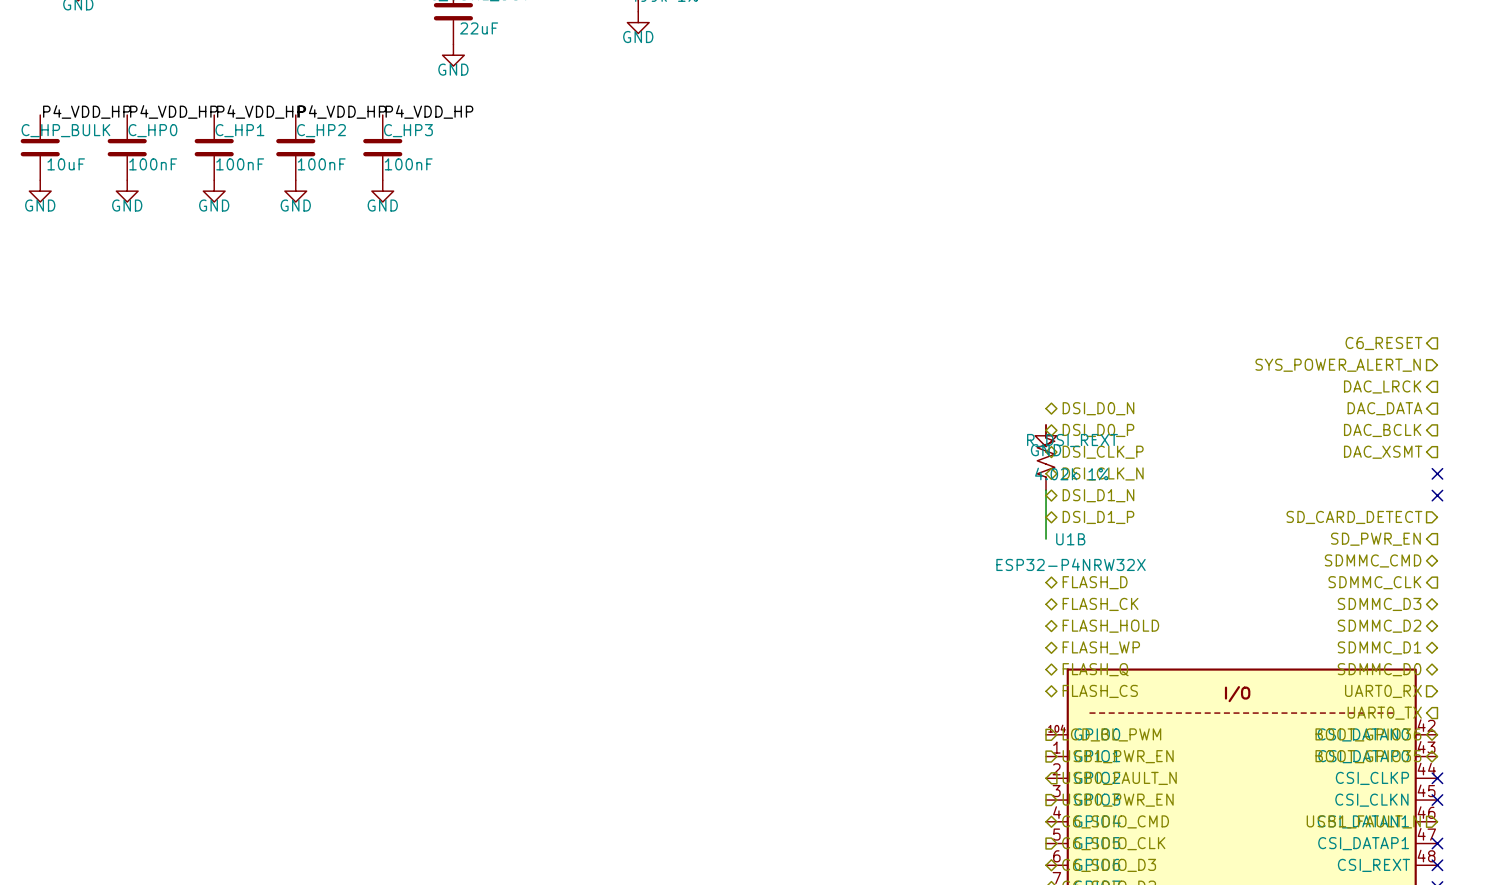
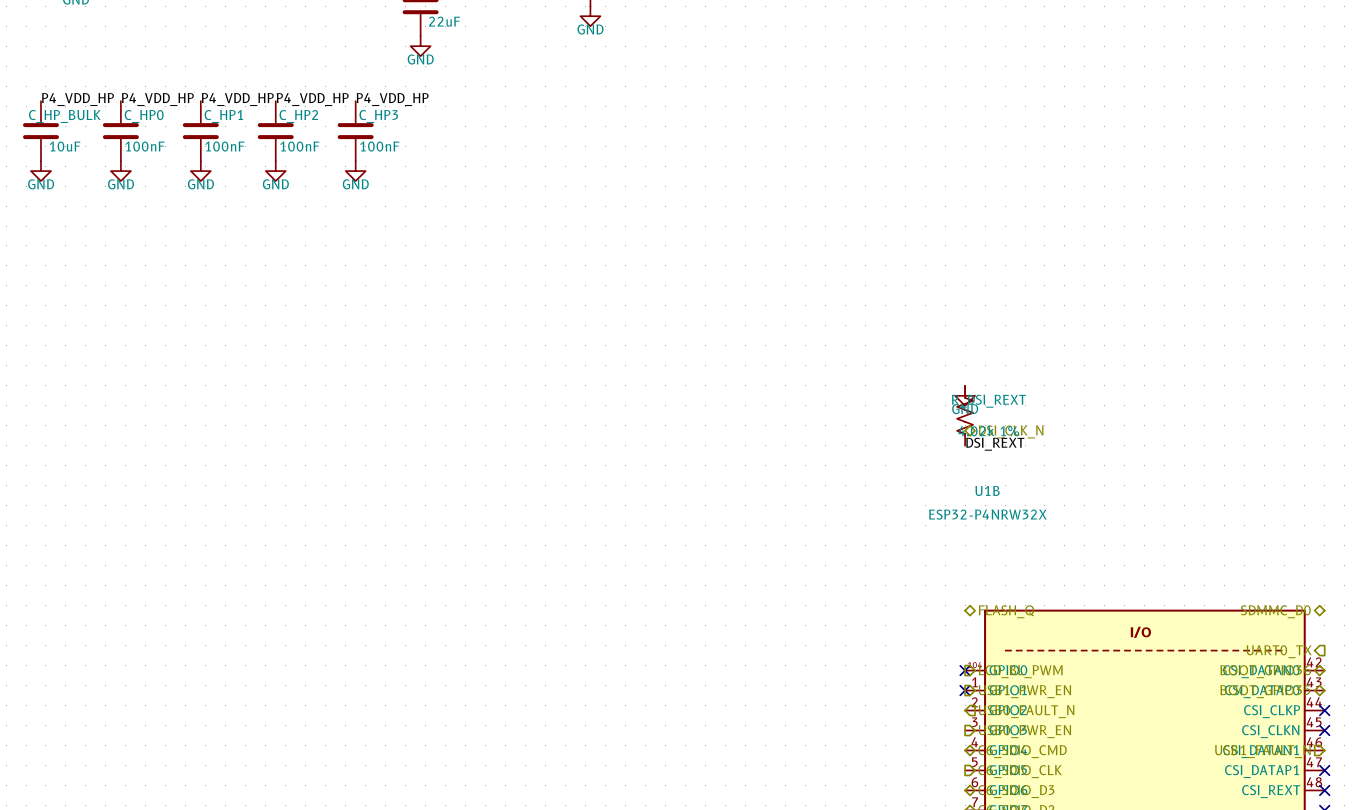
hierarchical label: C6_RESET (1383, 343) -> none
hierarchical label: SYS_POWER_ALERT_N (1338, 365) -> none
hierarchical label: DAC_LRCK (1382, 386) -> none
hierarchical label: DSI_D0_N (1098, 408) -> none
hierarchical label: DAC_DATA (1384, 408) -> none
hierarchical label: DSI_D0_P (1098, 430) -> none
hierarchical label: DAC_BCLK (1382, 430) -> none
hierarchical label: DSI_CLK_P (1103, 452) -> none
hierarchical label: DAC_XSMT (1383, 452) -> none
no-connect mark: (1437, 473) -> none
label: none -> DSI_REXT (995, 444)
wire: (1046, 490) (1046, 539) -> none
hierarchical label: DSI_D1_N (1098, 495) -> none
no-connect mark: (1437, 495) -> none
hierarchical label: DSI_D1_P (1098, 517) -> none
hierarchical label: SD_CARD_DETECT (1354, 517) -> none
hierarchical label: SD_PWR_EN (1375, 539) -> none
hierarchical label: SDMMC_CMD (1373, 560) -> none
hierarchical label: FLASH_D (1095, 582) -> none
hierarchical label: SDMMC_CLK (1374, 582) -> none
hierarchical label: FLASH_CK (1100, 604) -> none
hierarchical label: SDMMC_D3 (1379, 604) -> none
hierarchical label: FLASH_HOLD (1110, 626) -> none
hierarchical label: SDMMC_D2 (1379, 626) -> none
hierarchical label: FLASH_WP (1101, 647) -> none
hierarchical label: SDMMC_D1 (1379, 647) -> none
hierarchical label: FLASH_CS (1100, 691) -> none
hierarchical label: UART0_RX (1383, 691) -> none
no-connect mark: none -> (965, 670)
no-connect mark: none -> (965, 690)

